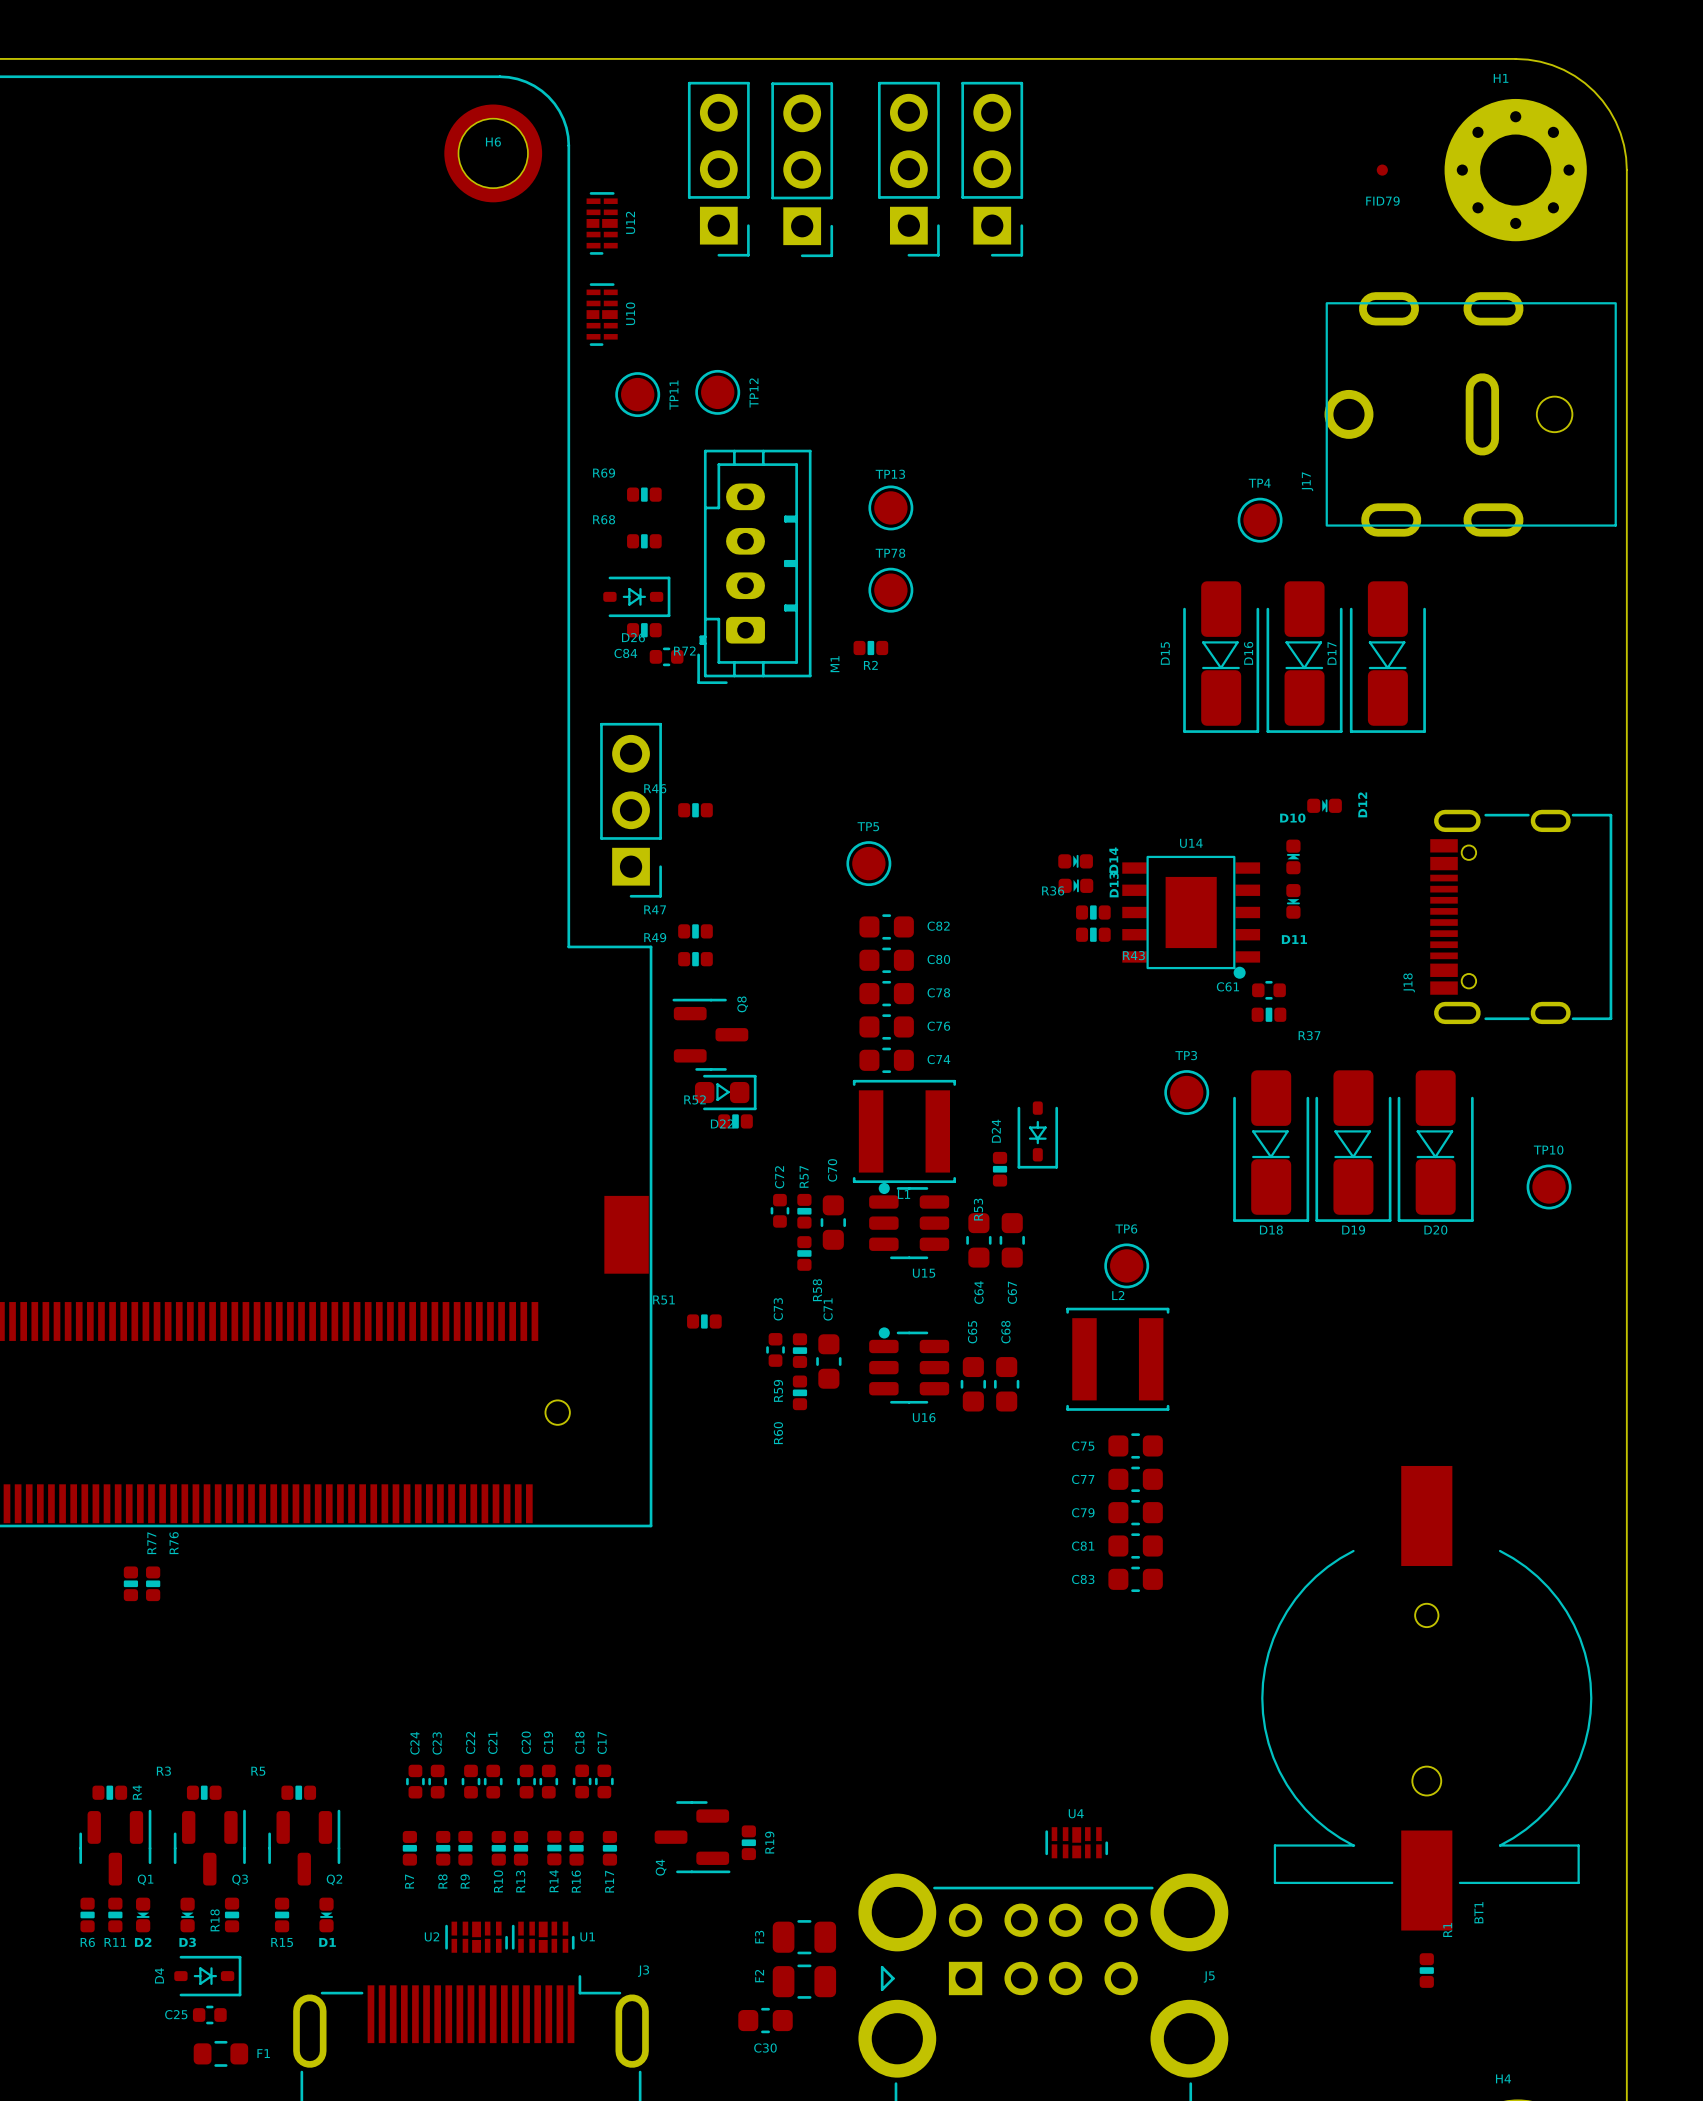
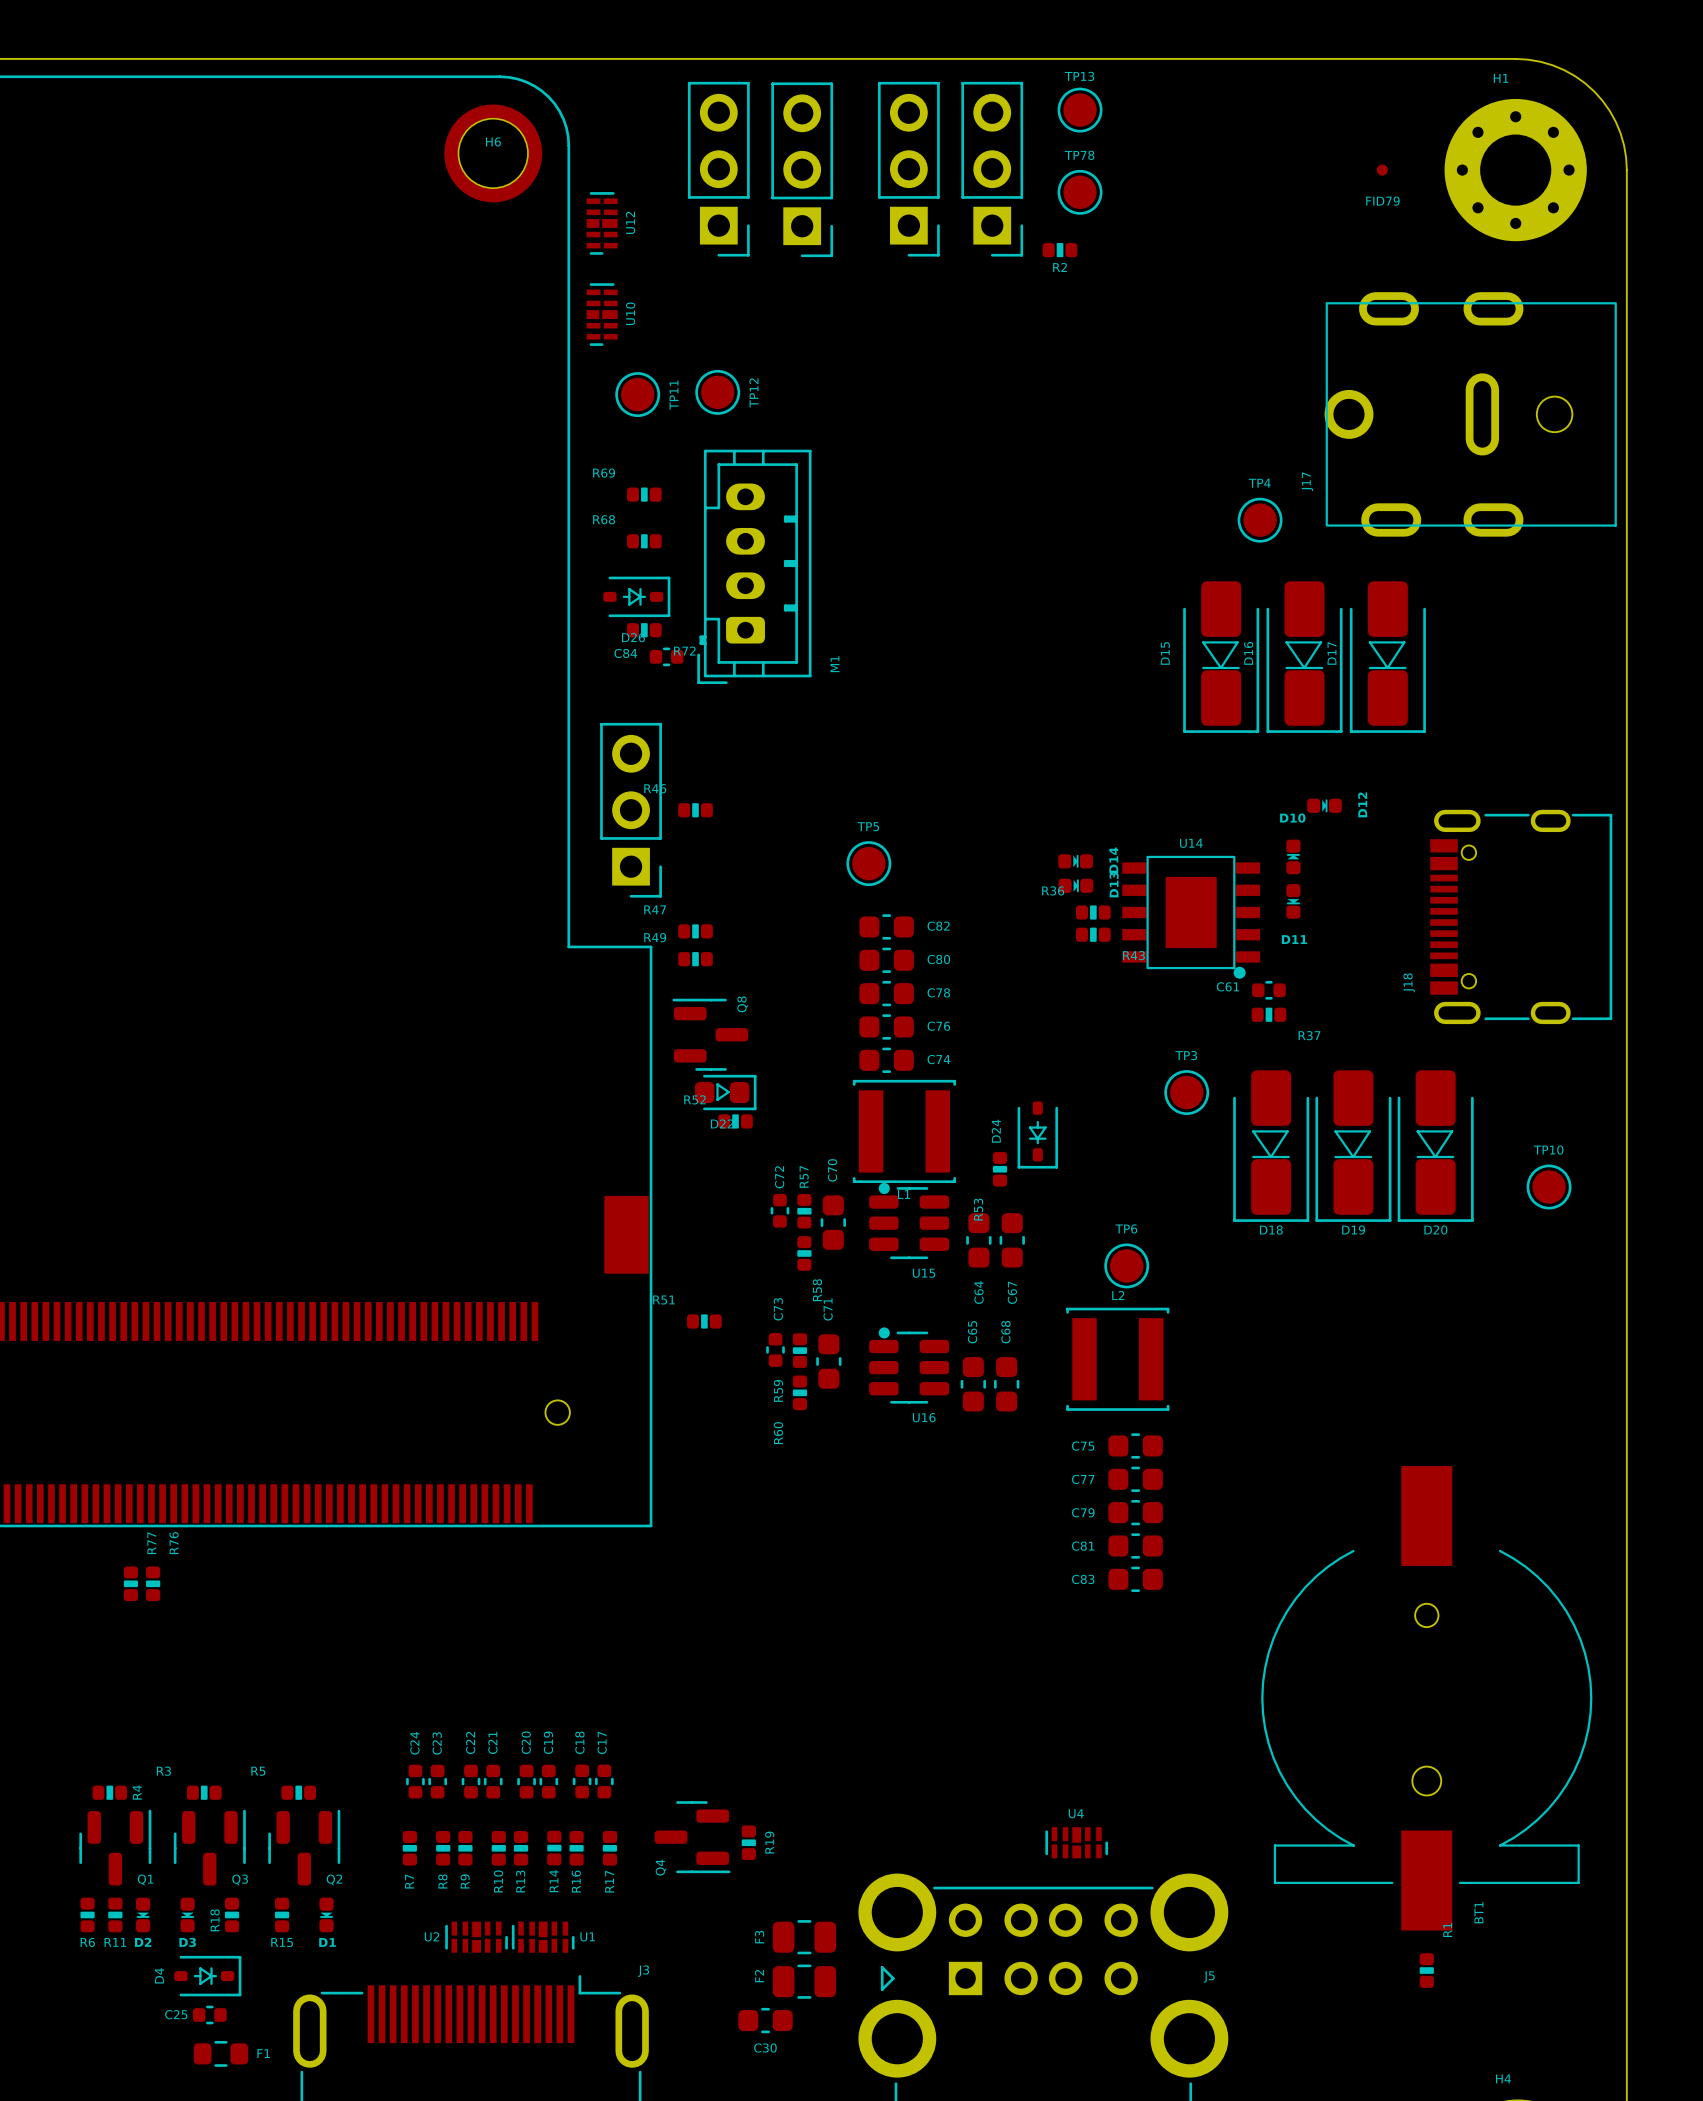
TP13 position: (890, 507) -> (1080, 110)
TP78 position: (890, 590) -> (1080, 192)
R2 position: (870, 647) -> (1060, 250)

